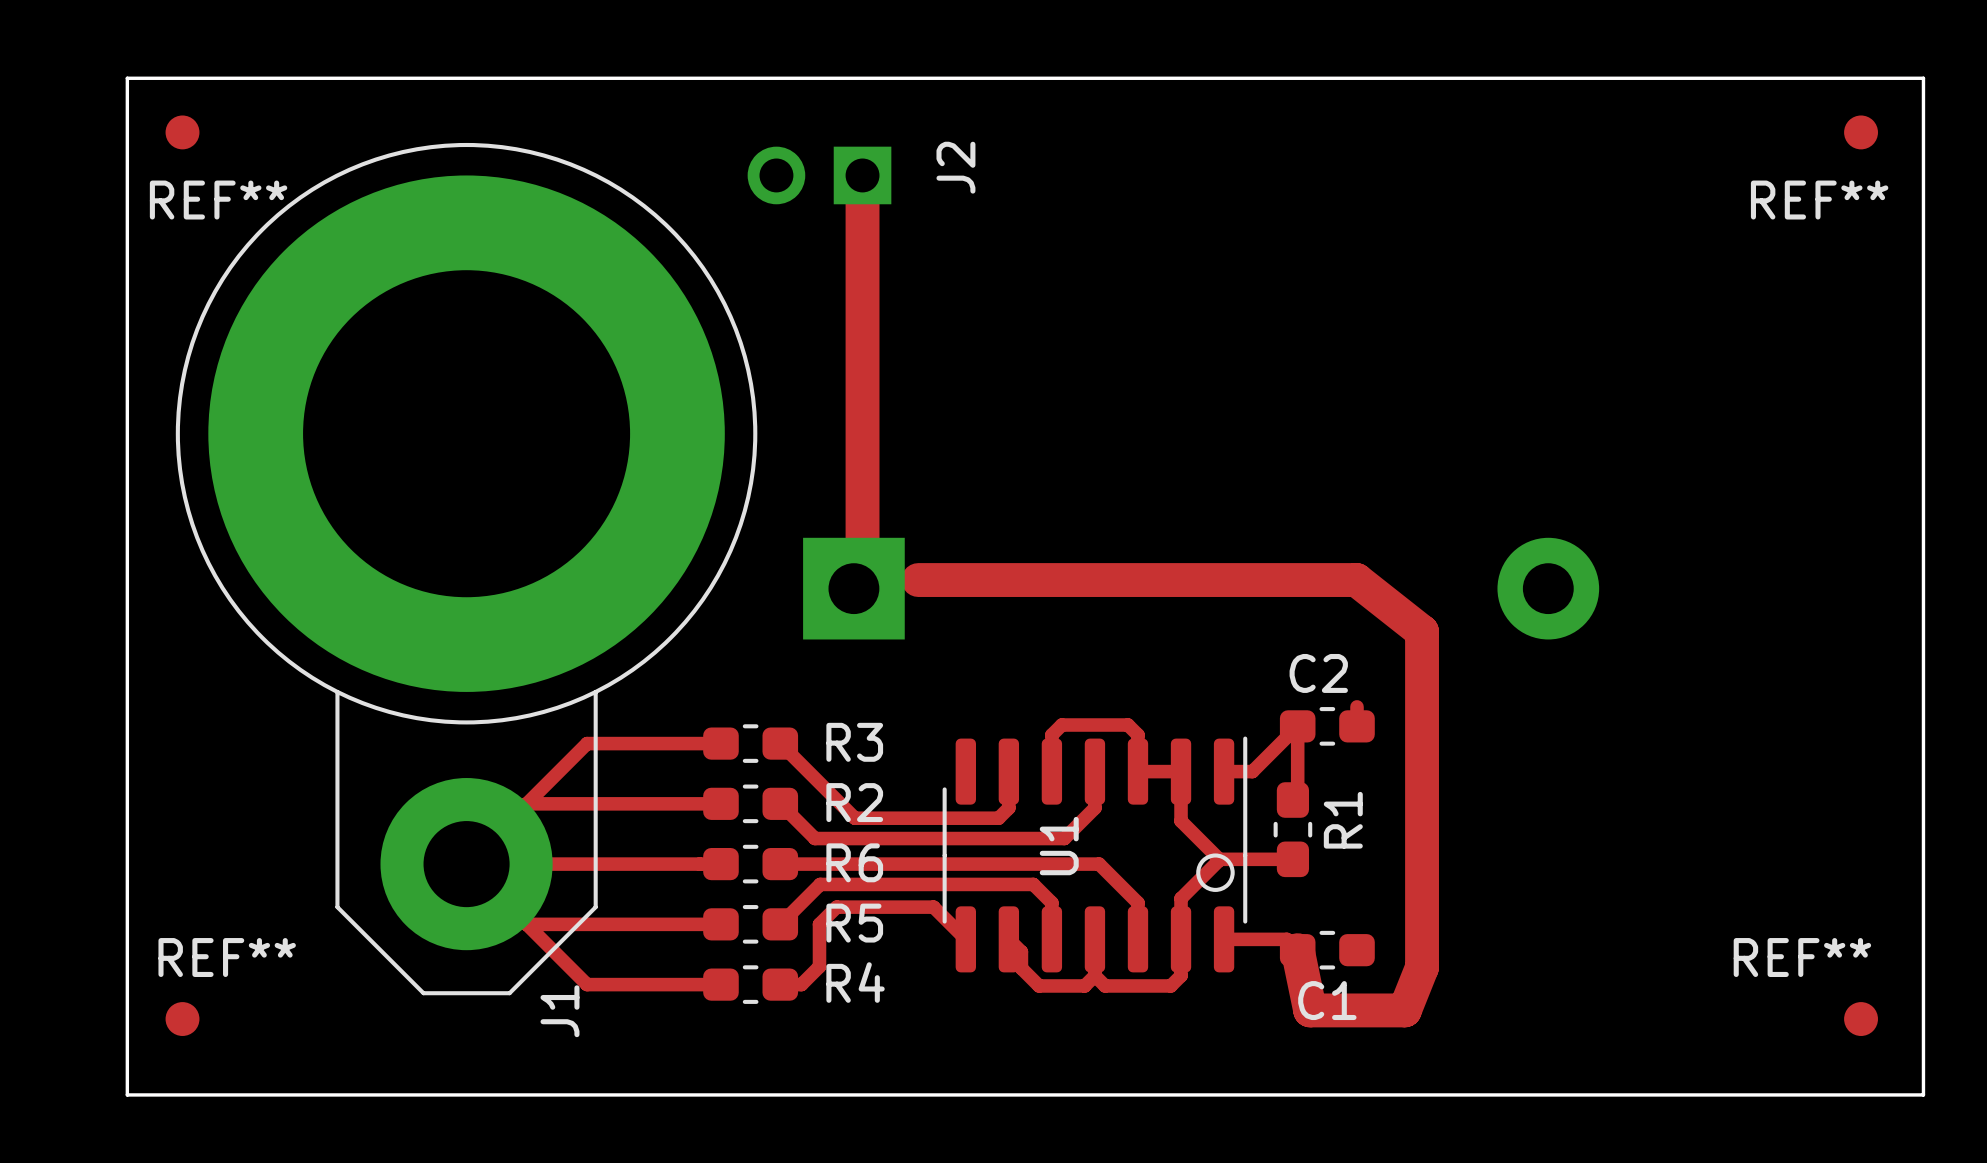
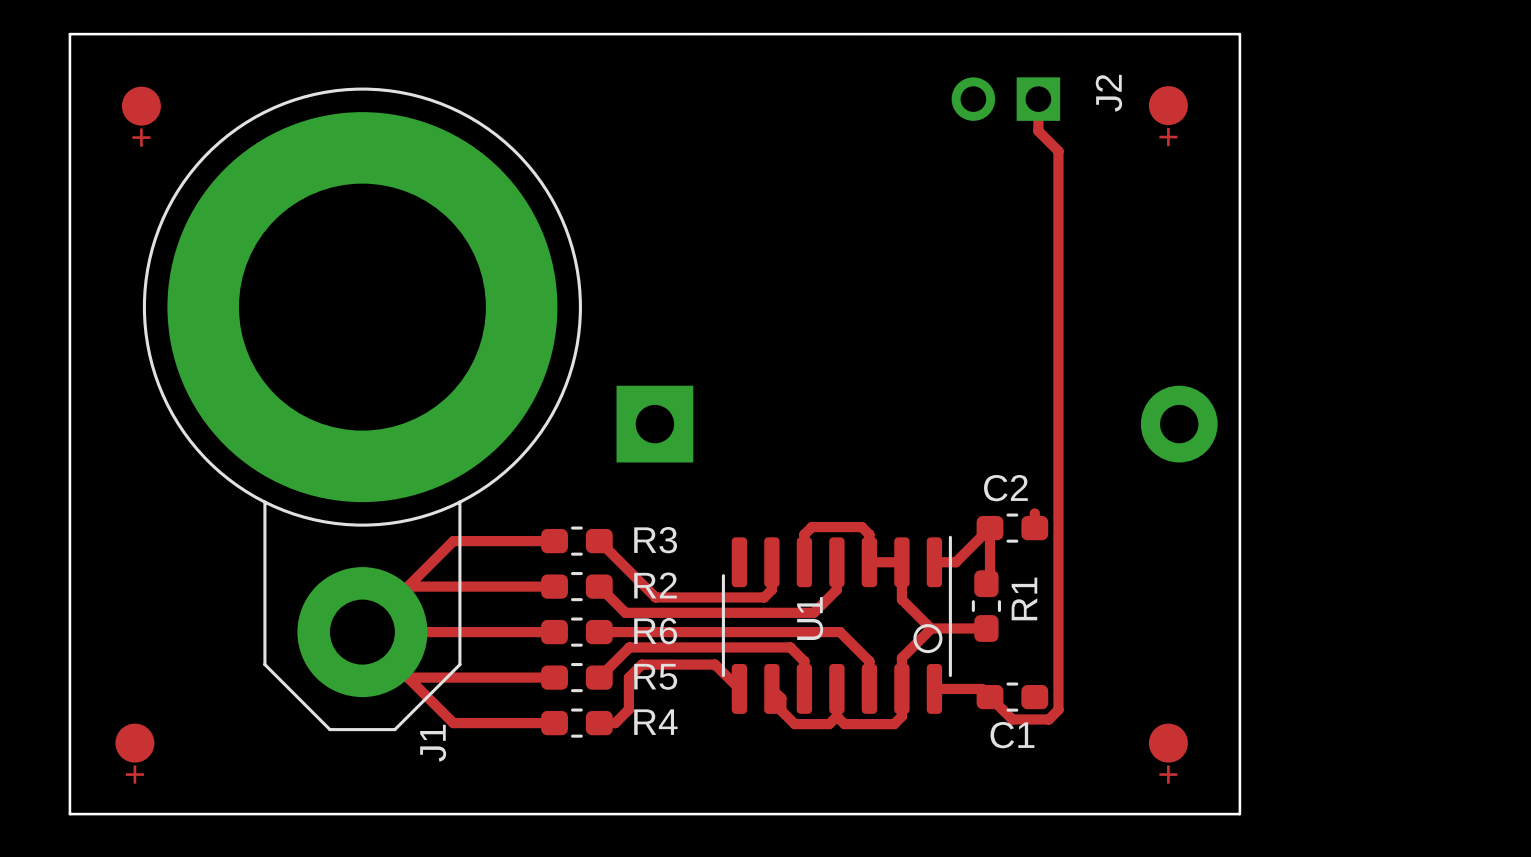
board edge: (127, 78) (1923, 78) (1923, 1094) (127, 1094) (127, 78) -> (69, 34) (69, 814) (1239, 814) (1239, 34) (69, 34)
REF**: (182, 132) -> none
REF**: (1861, 132) -> none
part: none -> (1168, 105)
part: none -> (141, 106)
J2 position: (819, 175) -> (1005, 99)
top track: (862, 175) (862, 571) (853, 580) (1356, 580) (1422, 631) (1422, 967) (1404, 1010) (1310, 1010) (1297, 950) -> (1038, 99) (1038, 131) (1058, 151) (1058, 709) (1048, 719) (1012, 719) (990, 697)
part: none -> (134, 743)
part: none -> (1168, 743)
REF**: (182, 1019) -> none
REF**: (1861, 1019) -> none

